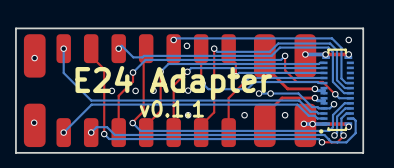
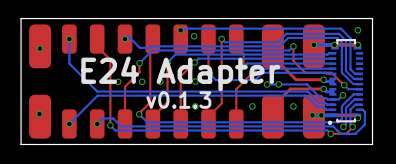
text: v0.1.1 (171, 108) -> v0.1.3 (178, 100)

